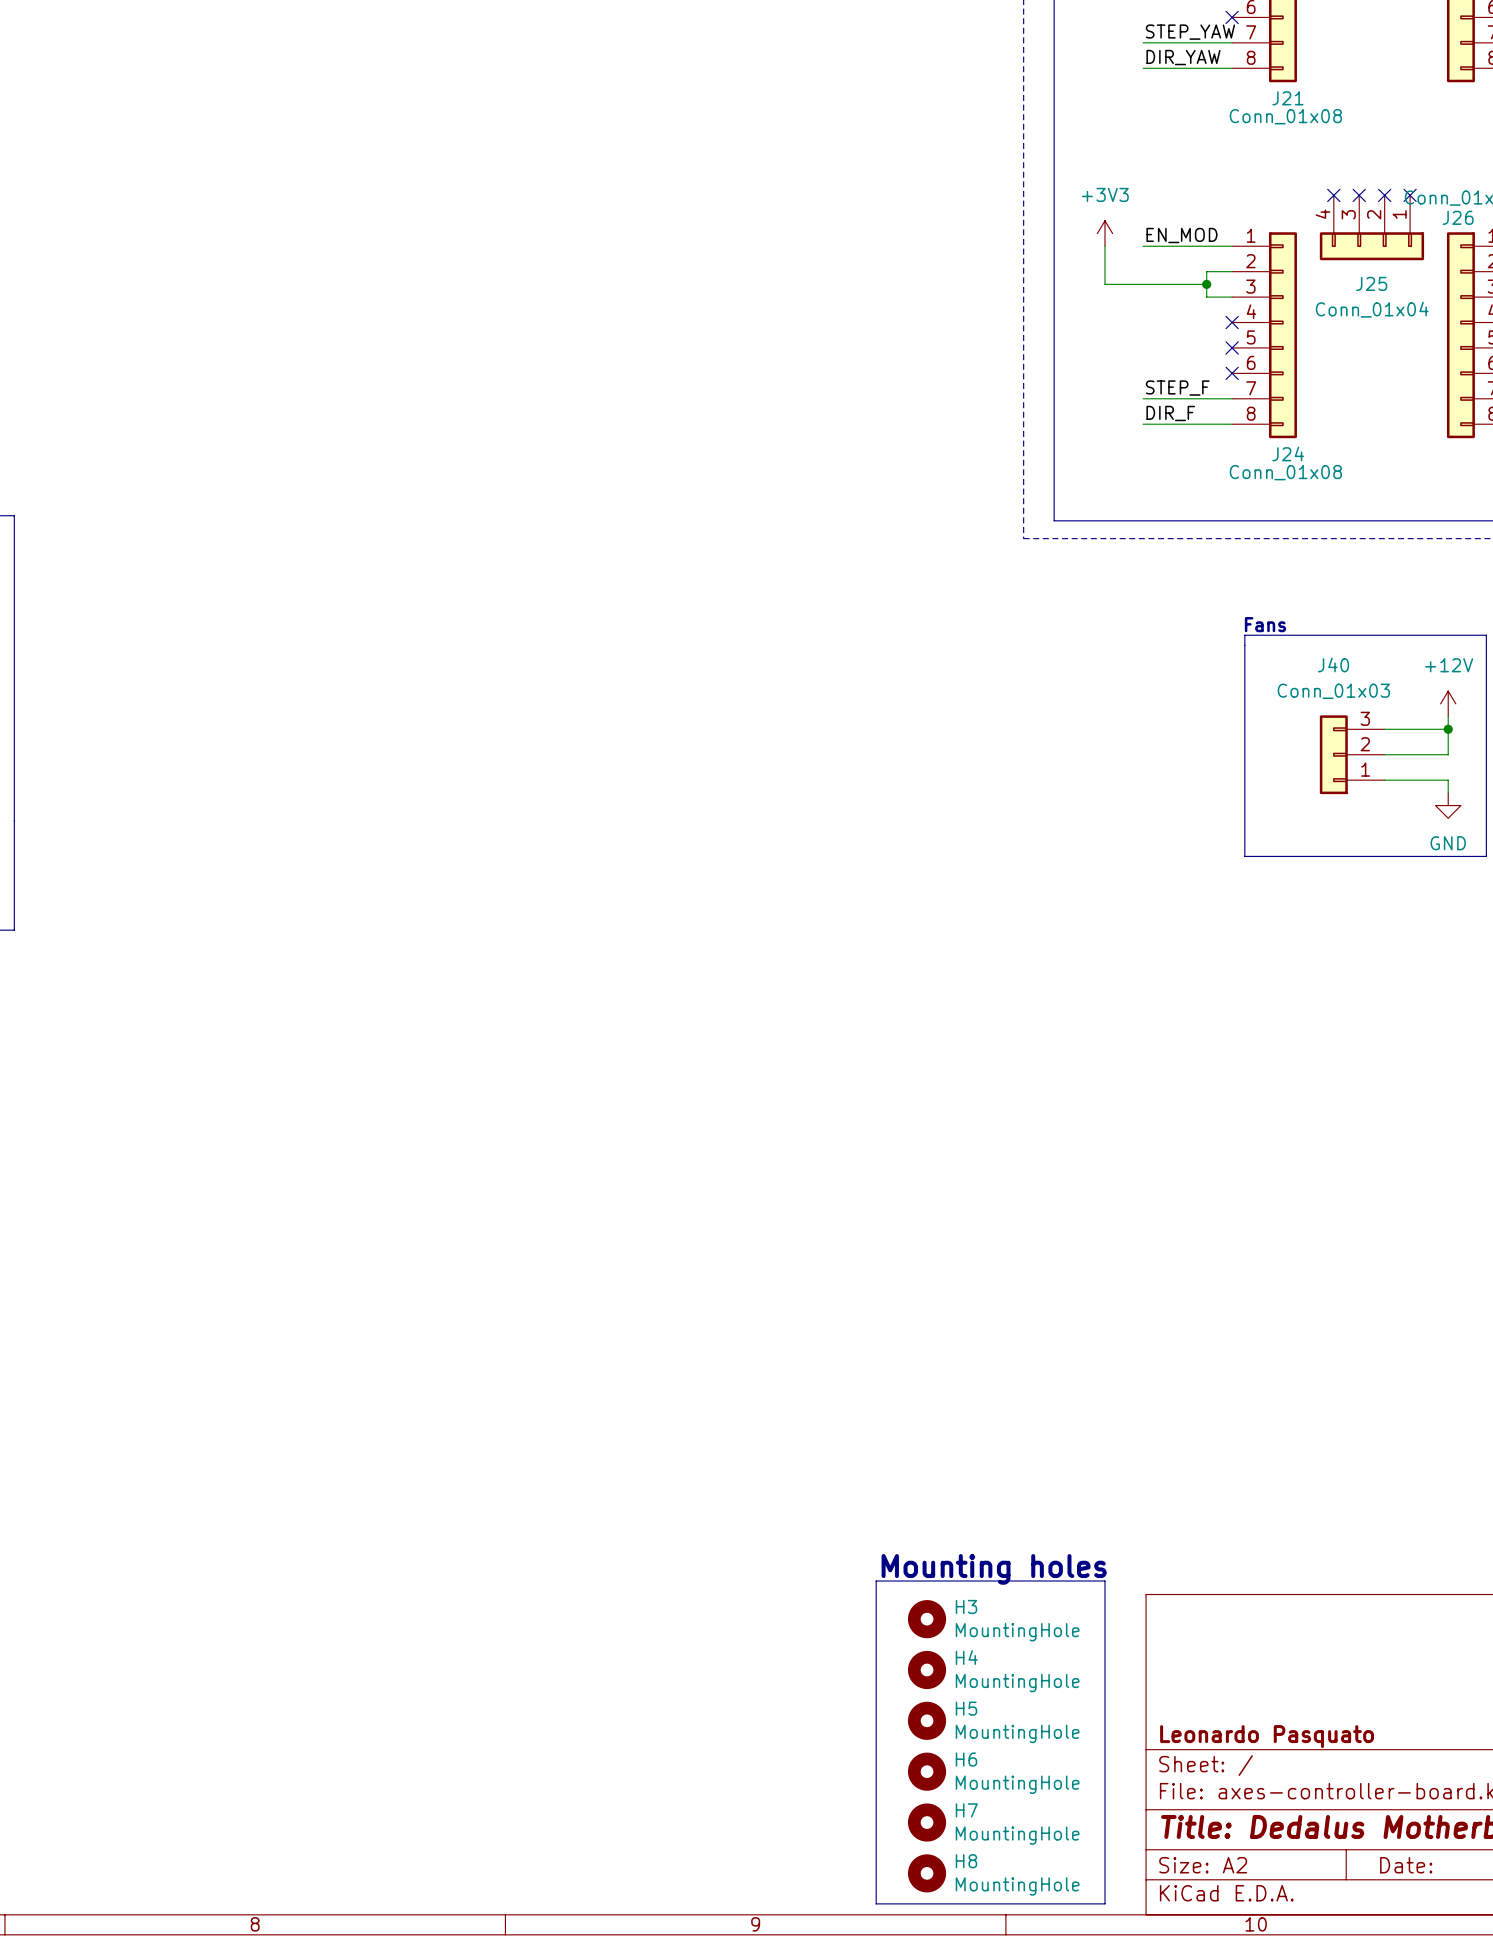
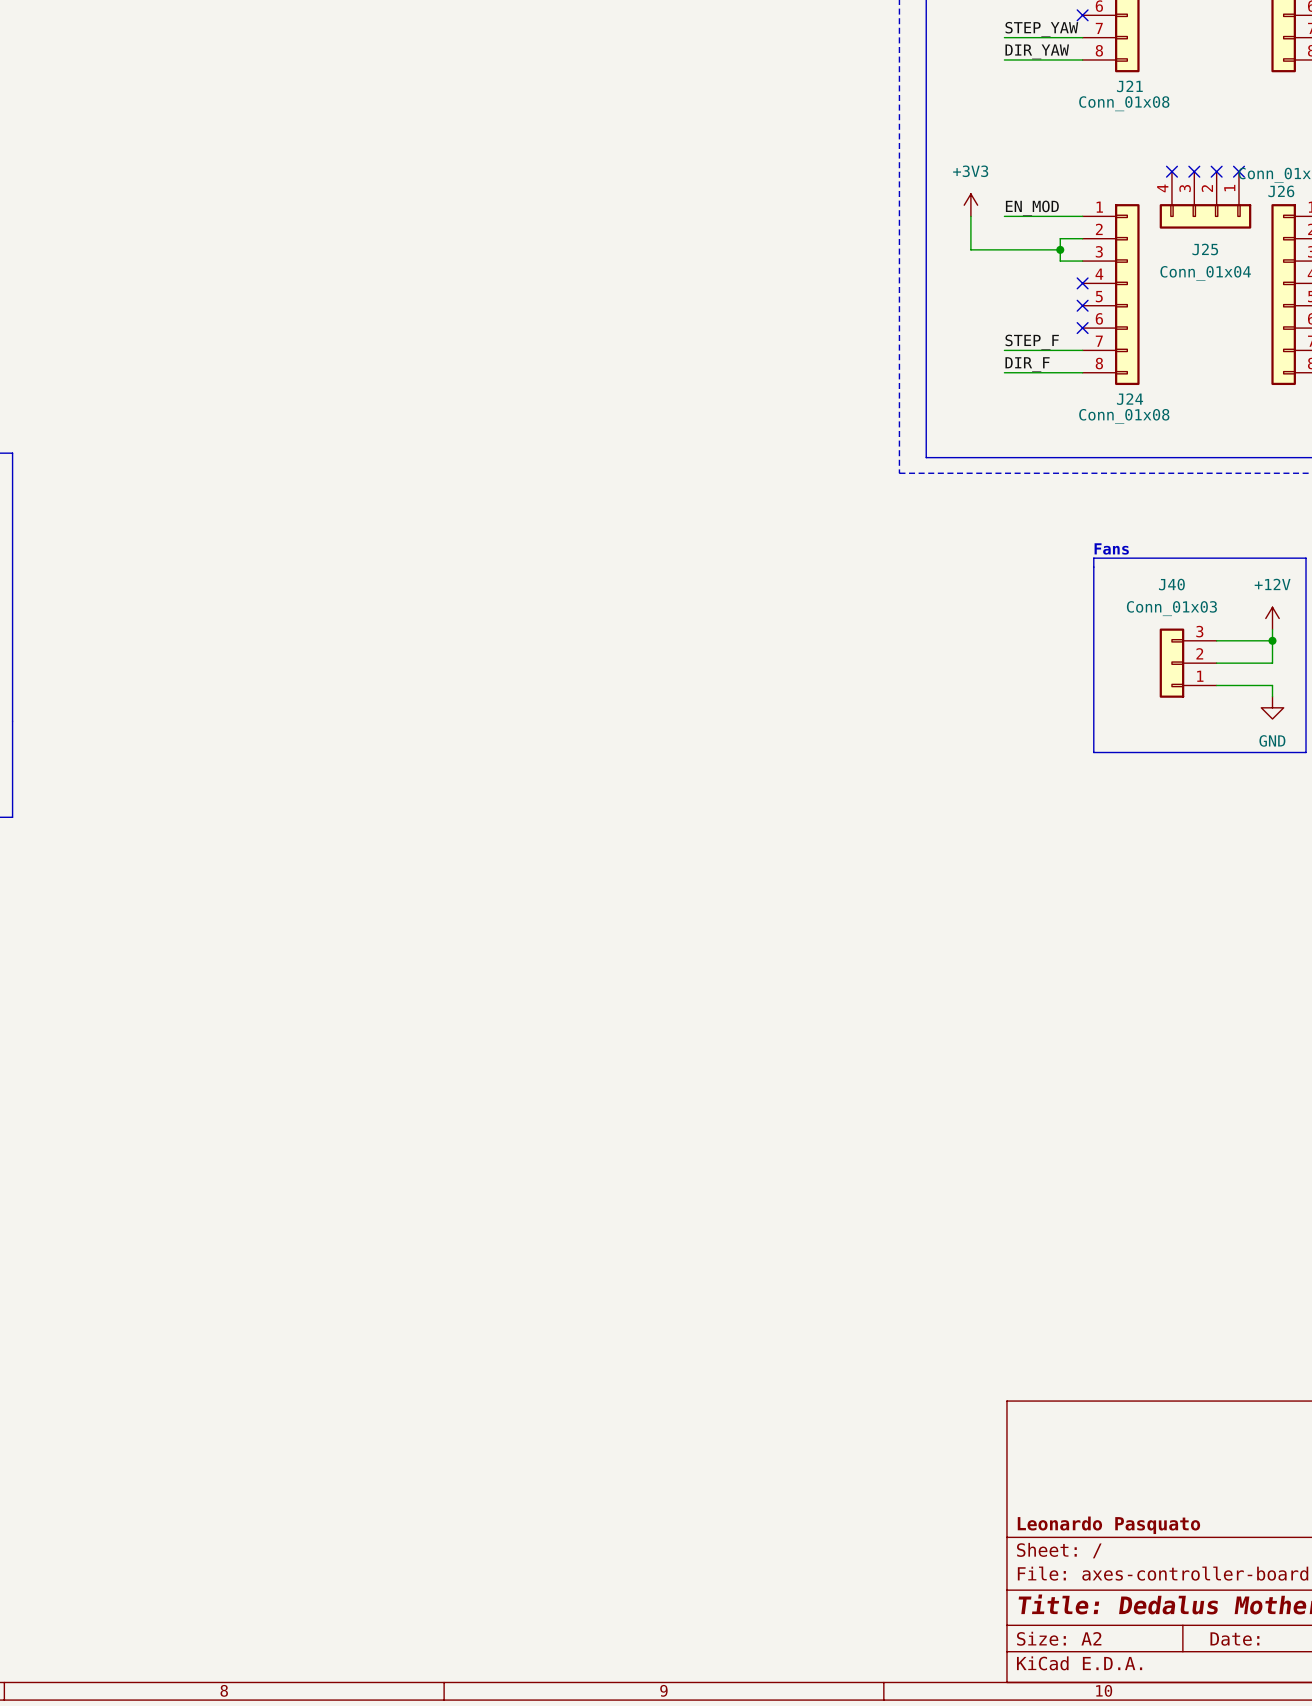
text: Mounting holes (994, 1569) -> none
line: (876, 1581) (876, 1903) (1105, 1903) (1105, 1581) (876, 1581) -> none
H3: MountingHole (927, 1619) -> none
H4: MountingHole (927, 1669) -> none
H5: MountingHole (927, 1720) -> none
H6: MountingHole (927, 1771) -> none
H7: MountingHole (927, 1822) -> none
H8: MountingHole (927, 1873) -> none

